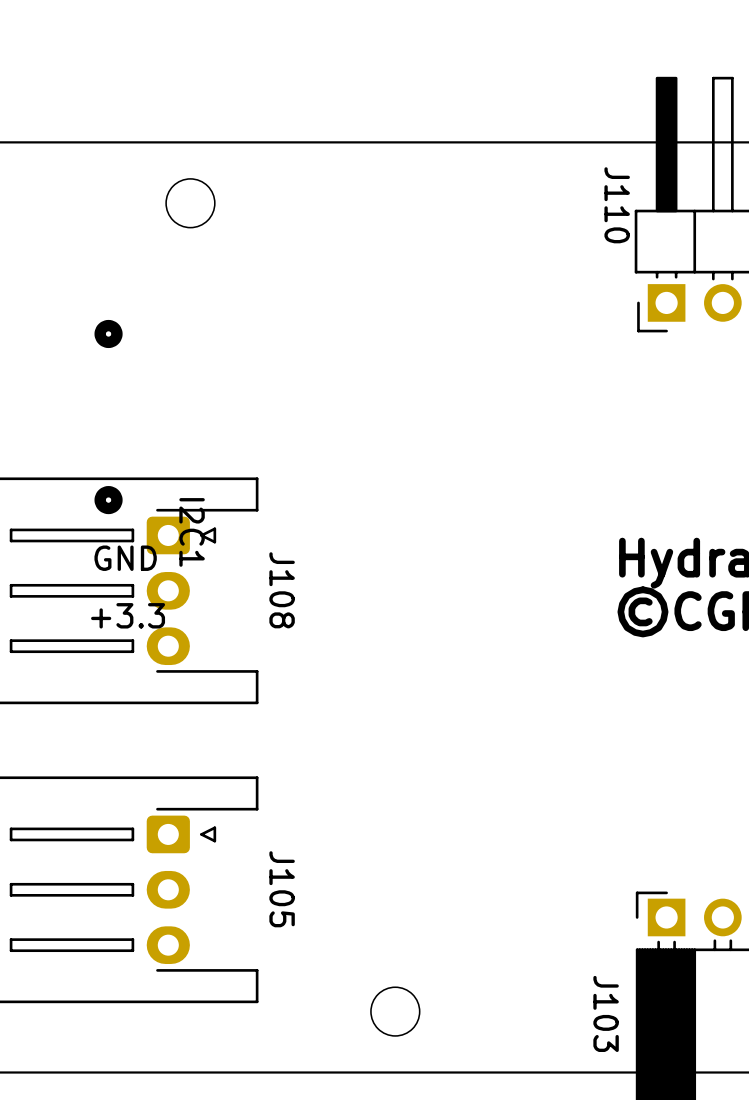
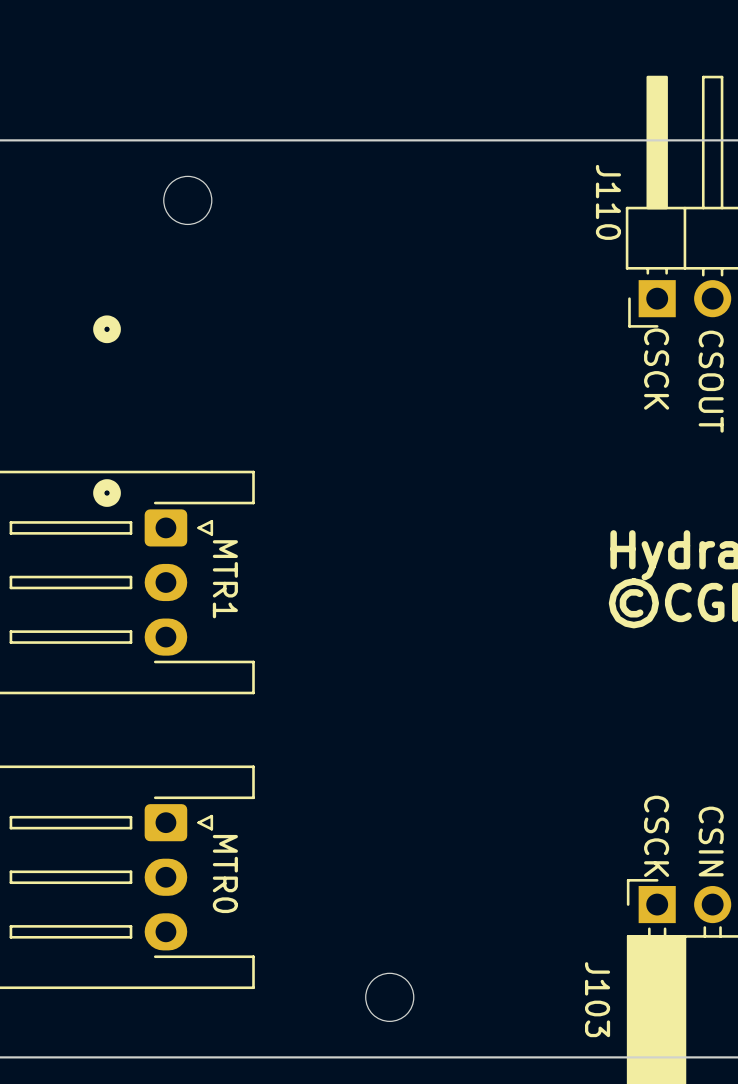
text: none -> CSCK (656, 369)
text: none -> CSOUT (711, 381)
text: I2C1 (192, 532) -> none
text: GND (125, 558) -> none
text: none -> MTR1 (225, 579)
J108 name: J108 (282, 590) -> none
text: +3.3 (128, 615) -> none
text: none -> CSCK (656, 836)
text: none -> CSIN (711, 841)
text: none -> MTR0 (225, 874)
J105 name: J105 (282, 889) -> none

